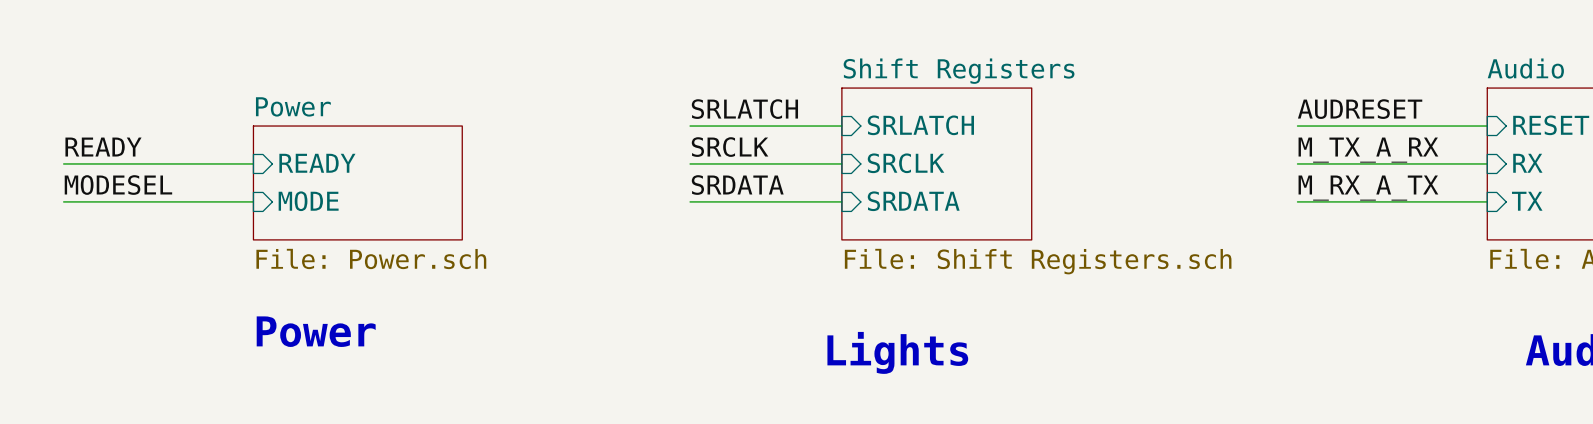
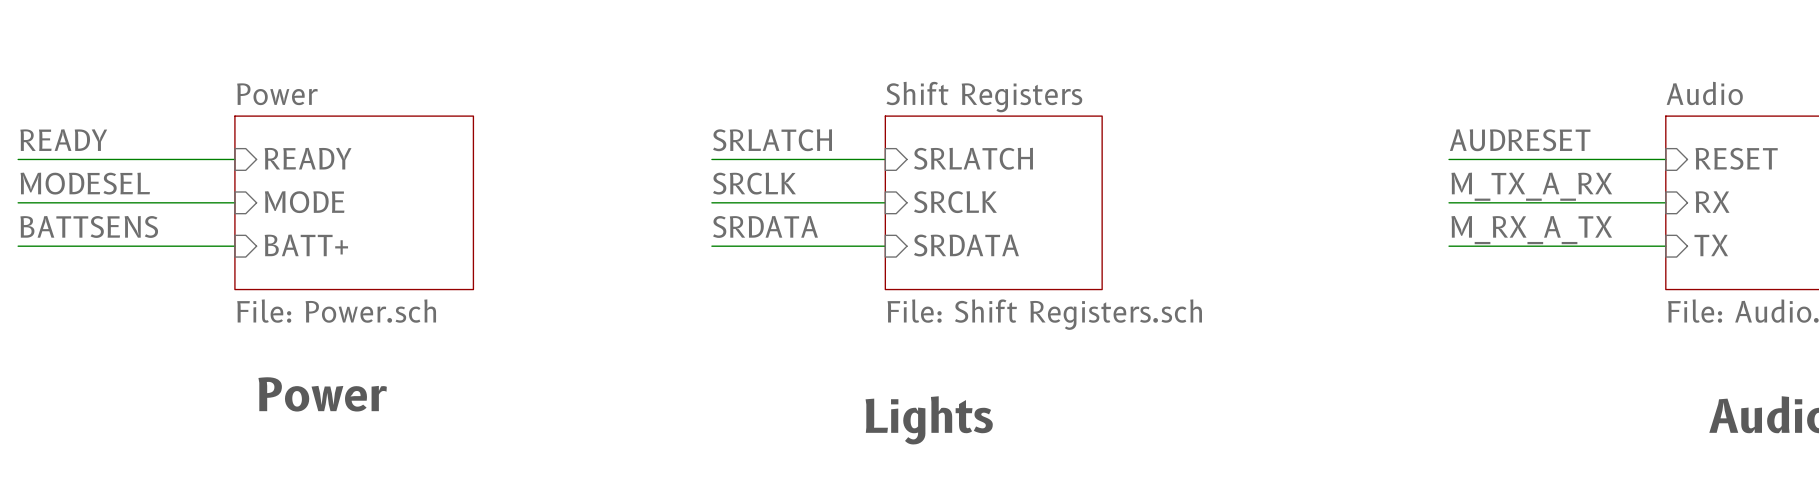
label position: SRLATCH (744, 109) -> SRLATCH (772, 140)
sheet pin position: SRLATCH (920, 125) -> SRLATCH (973, 158)
wire: none -> (18, 159) (234, 159)
wire: (803, 126) (841, 126) -> (711, 159) (755, 159)
label position: READY (103, 147) -> READY (63, 140)
label position: SRCLK (730, 147) -> SRCLK (754, 183)
wire: (234, 163) (253, 163) -> (18, 202) (39, 202)
sheet pin position: READY (317, 163) -> READY (308, 158)
sheet Power: none -> File: Power.sch (354, 202)
wire: (803, 163) (841, 163) -> (711, 202) (755, 202)
sheet pin position: SRCLK (906, 163) -> SRCLK (955, 202)
sheet Shift Registers position: (936, 163) -> (993, 202)
sheet Power: File: Power.sch (357, 182) -> none
label: none -> BATTSENS (89, 226)
label position: MODESEL (118, 185) -> MODESEL (85, 183)
label position: SRDATA (737, 185) -> SRDATA (765, 226)
wire: (234, 201) (253, 201) -> (18, 246) (39, 246)
sheet pin: none -> BATT+ (306, 245)
sheet pin position: MODE (308, 201) -> MODE (304, 202)
wire: (803, 201) (841, 201) -> (711, 246) (755, 246)
sheet pin position: SRDATA (913, 201) -> SRDATA (966, 245)
text position: Lights (897, 352) -> Lights (929, 420)

